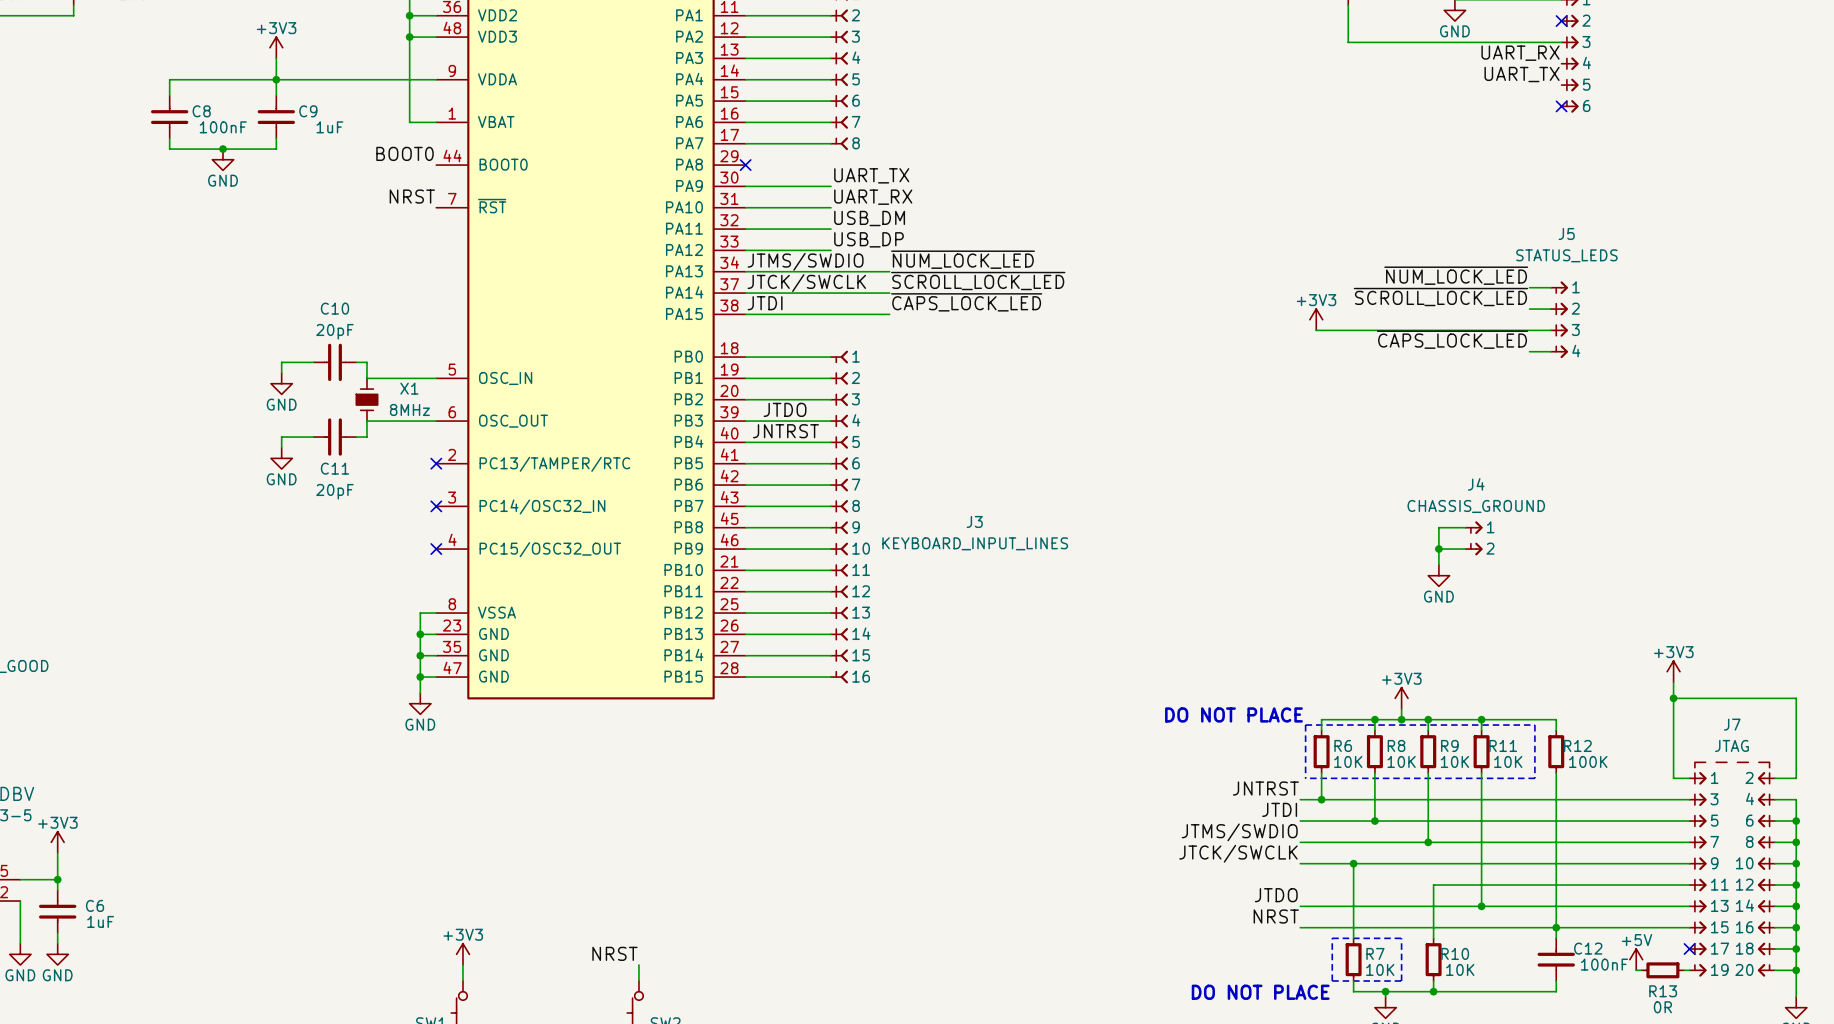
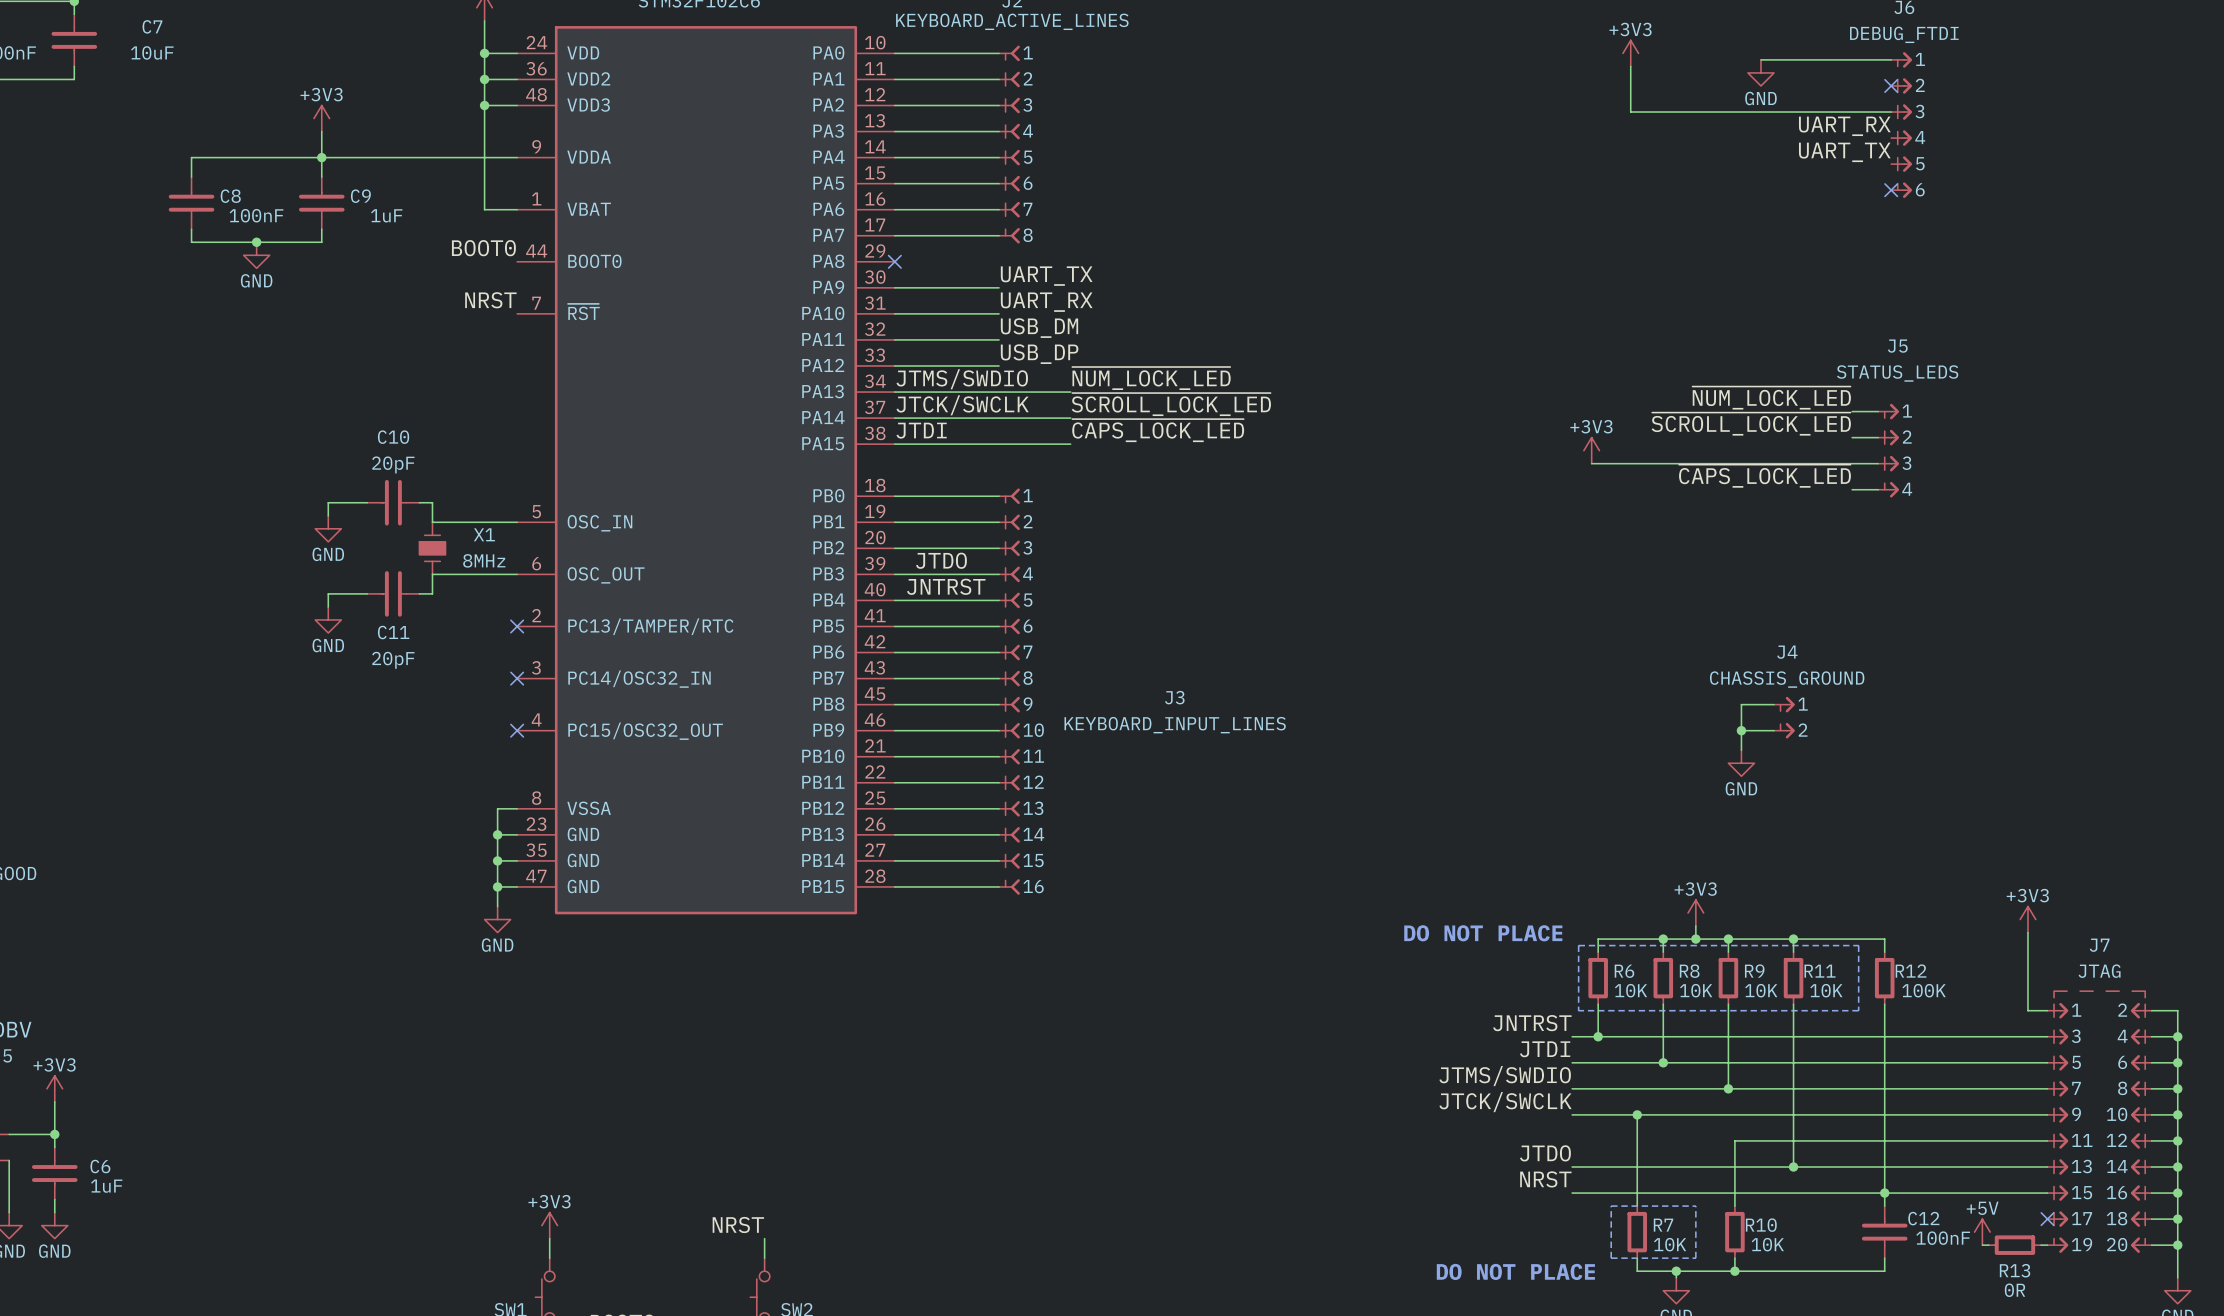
power symbol position: +3V3 (1673, 671) -> +3V3 (2027, 919)
wire: (1673, 698) (1796, 698) (1796, 778) -> (2177, 1036) (2177, 1010)
junction: (1673, 698) -> none
junction: none -> (2177, 1036)

